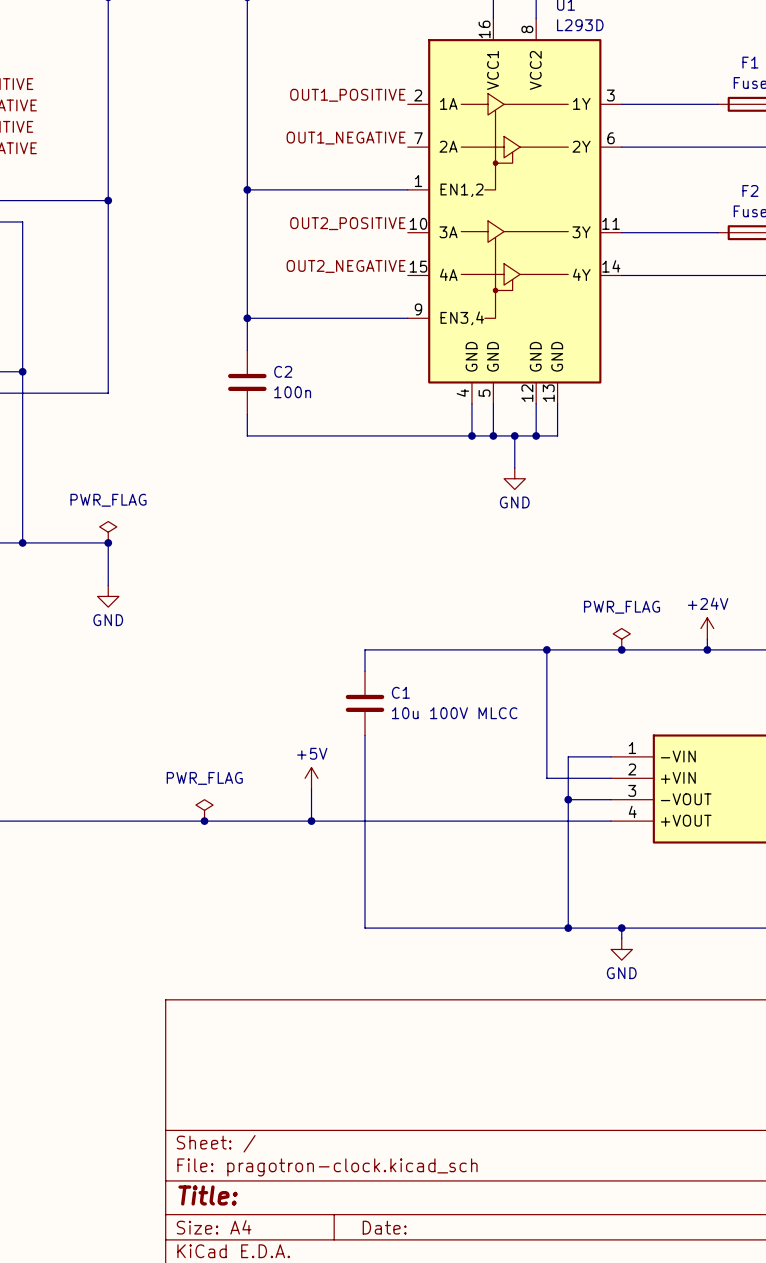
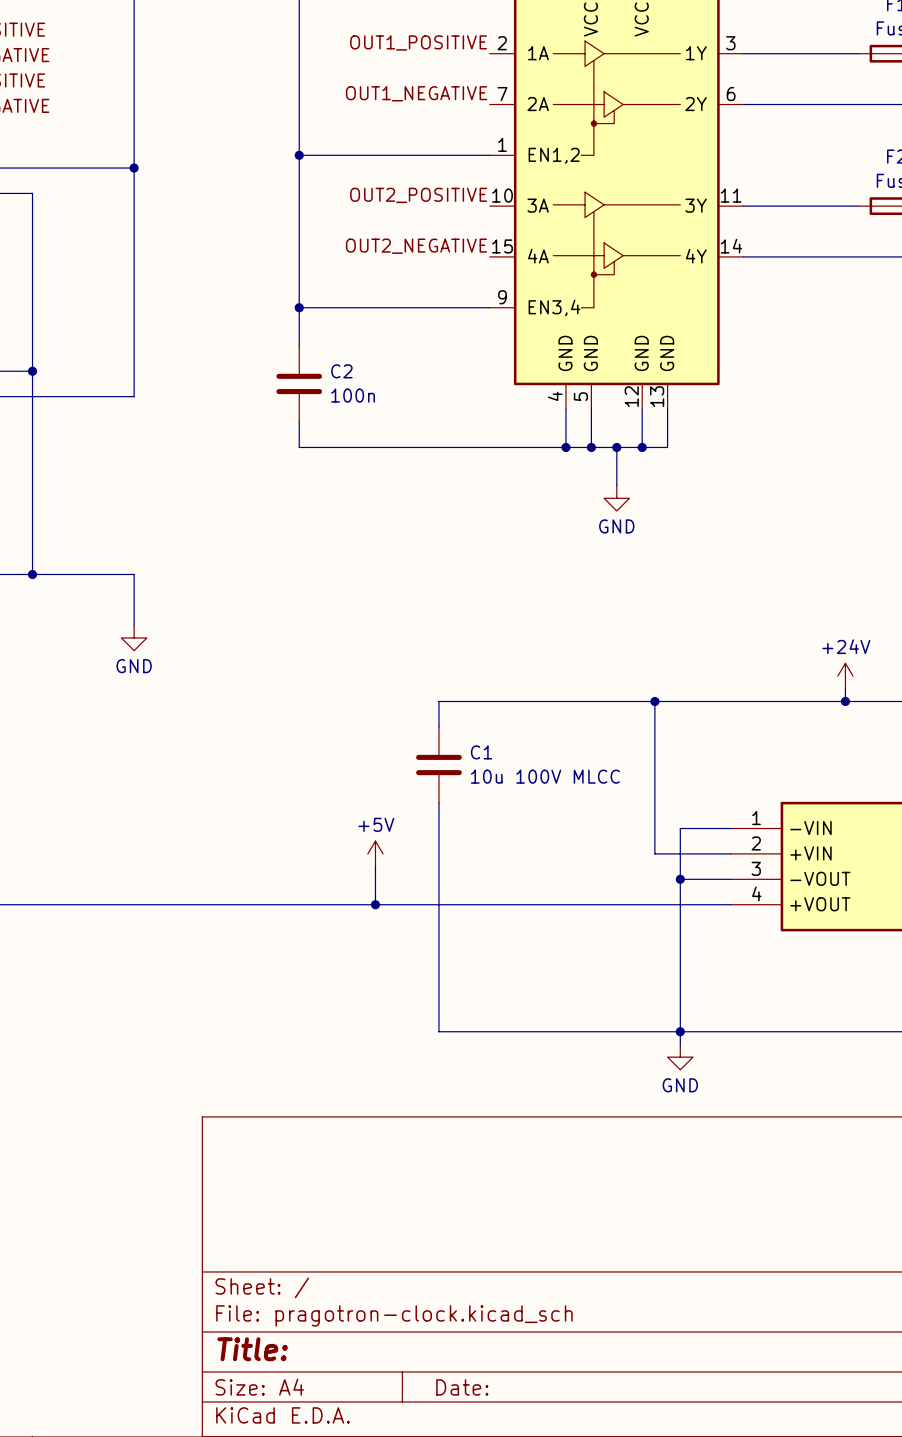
power symbol: PWR_FLAG (108, 532) -> none
junction: (108, 542) -> none
power symbol: PWR_FLAG (621, 639) -> none
junction: (621, 649) -> none
power symbol: PWR_FLAG (204, 810) -> none
junction: (204, 821) -> none
wire: (621, 928) (621, 938) -> (680, 1031) (680, 1044)
junction: (621, 928) -> none
power symbol position: GND (621, 949) -> GND (680, 1057)

